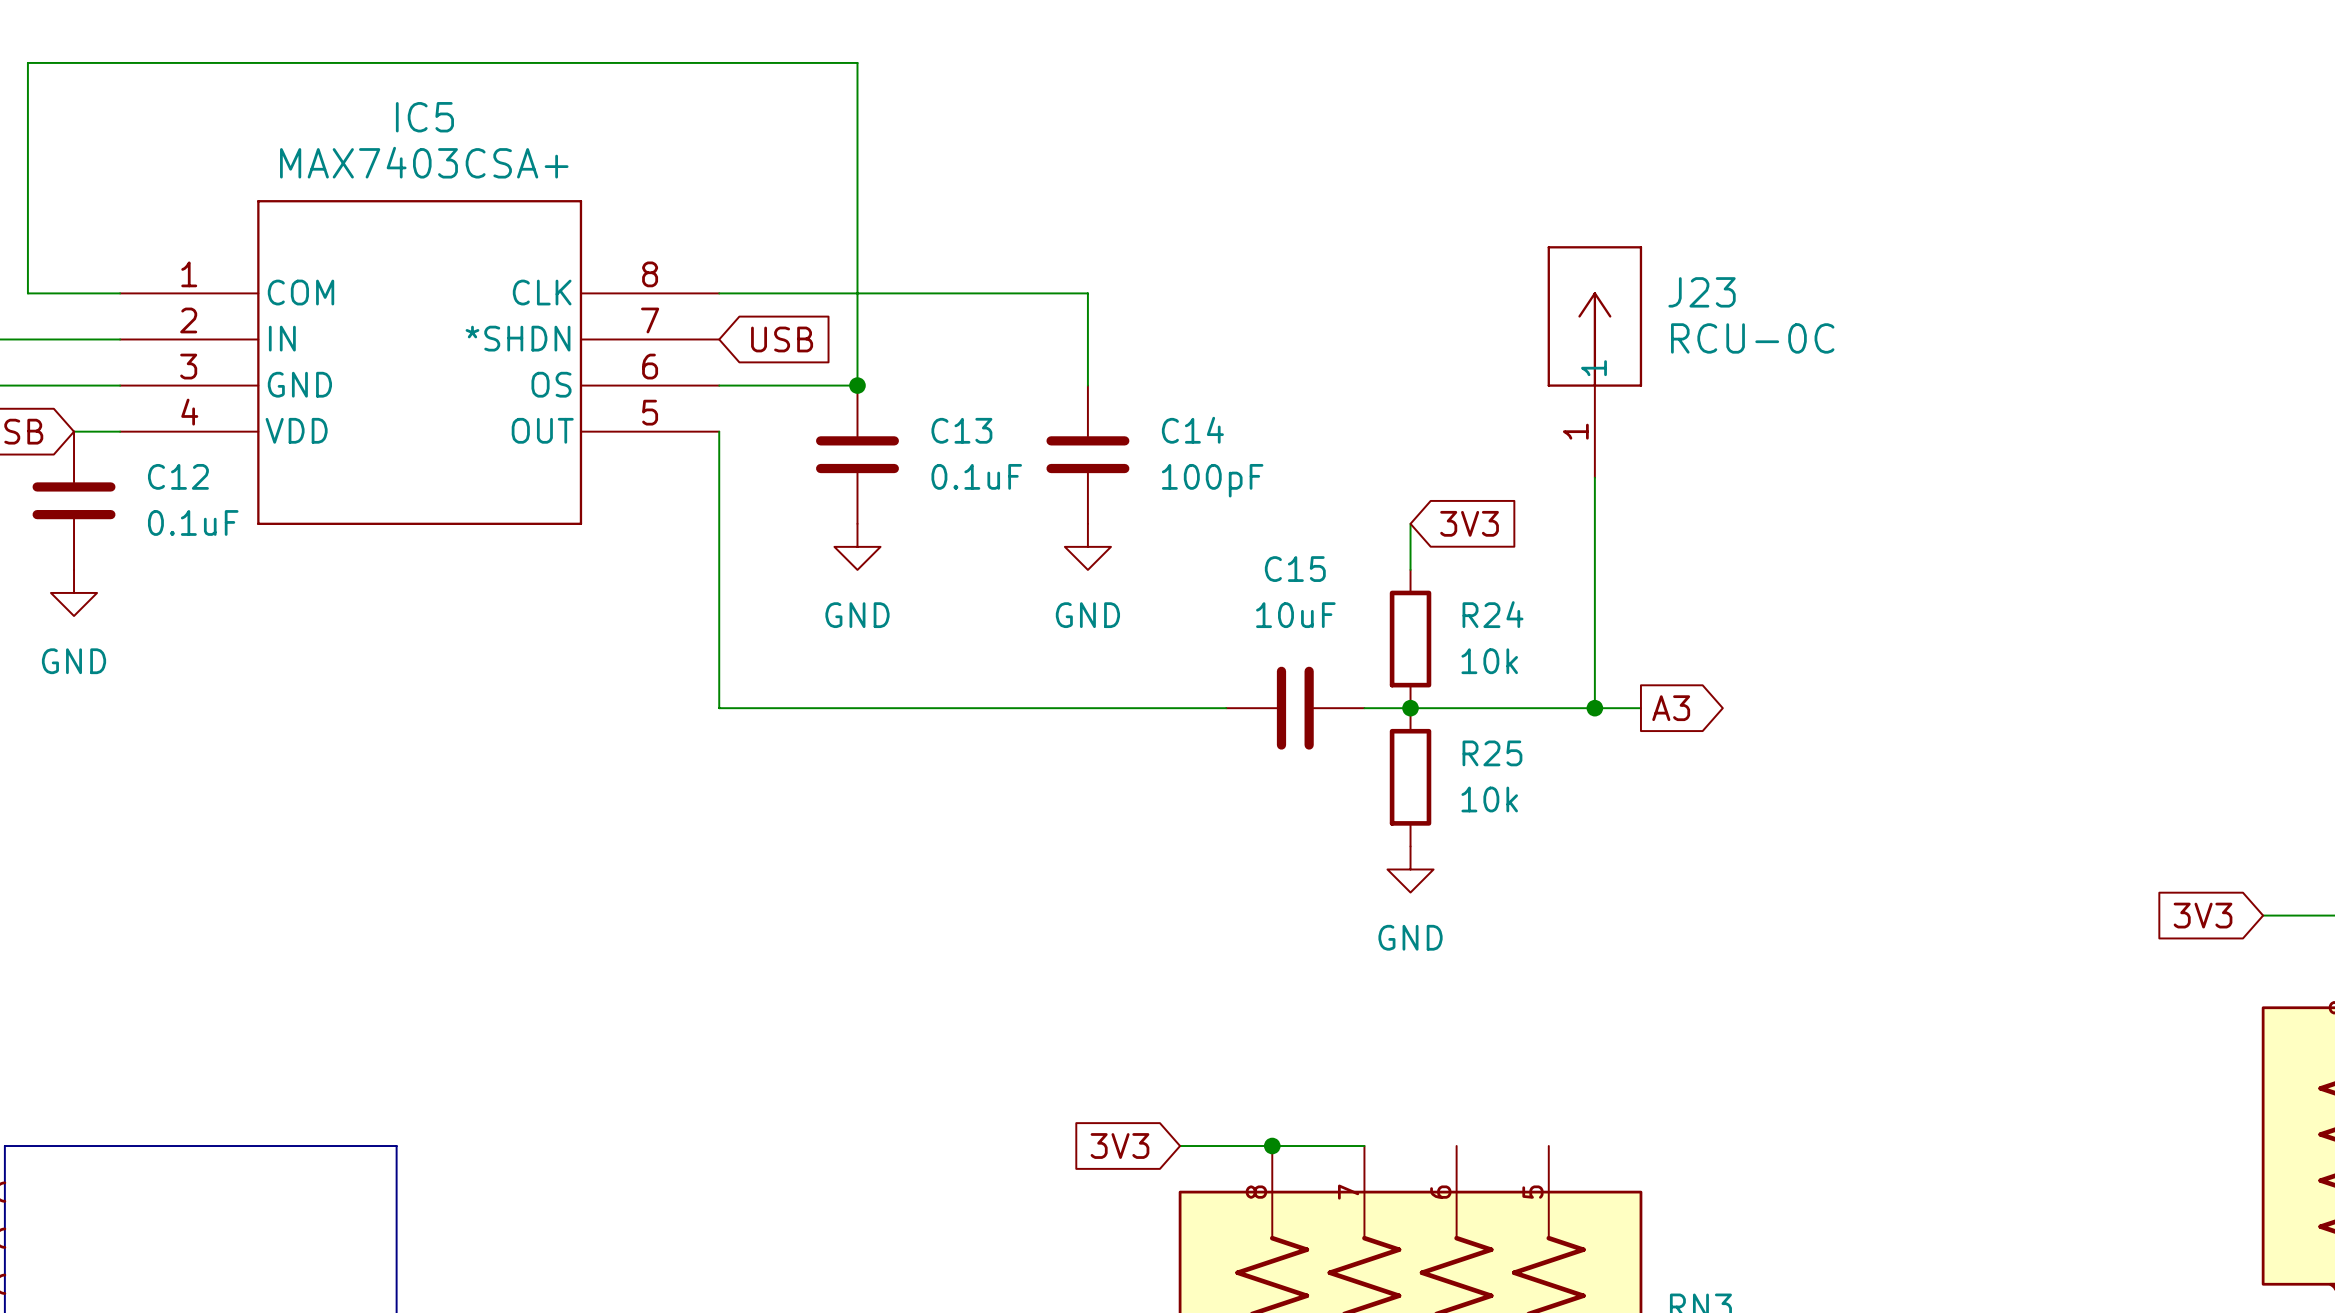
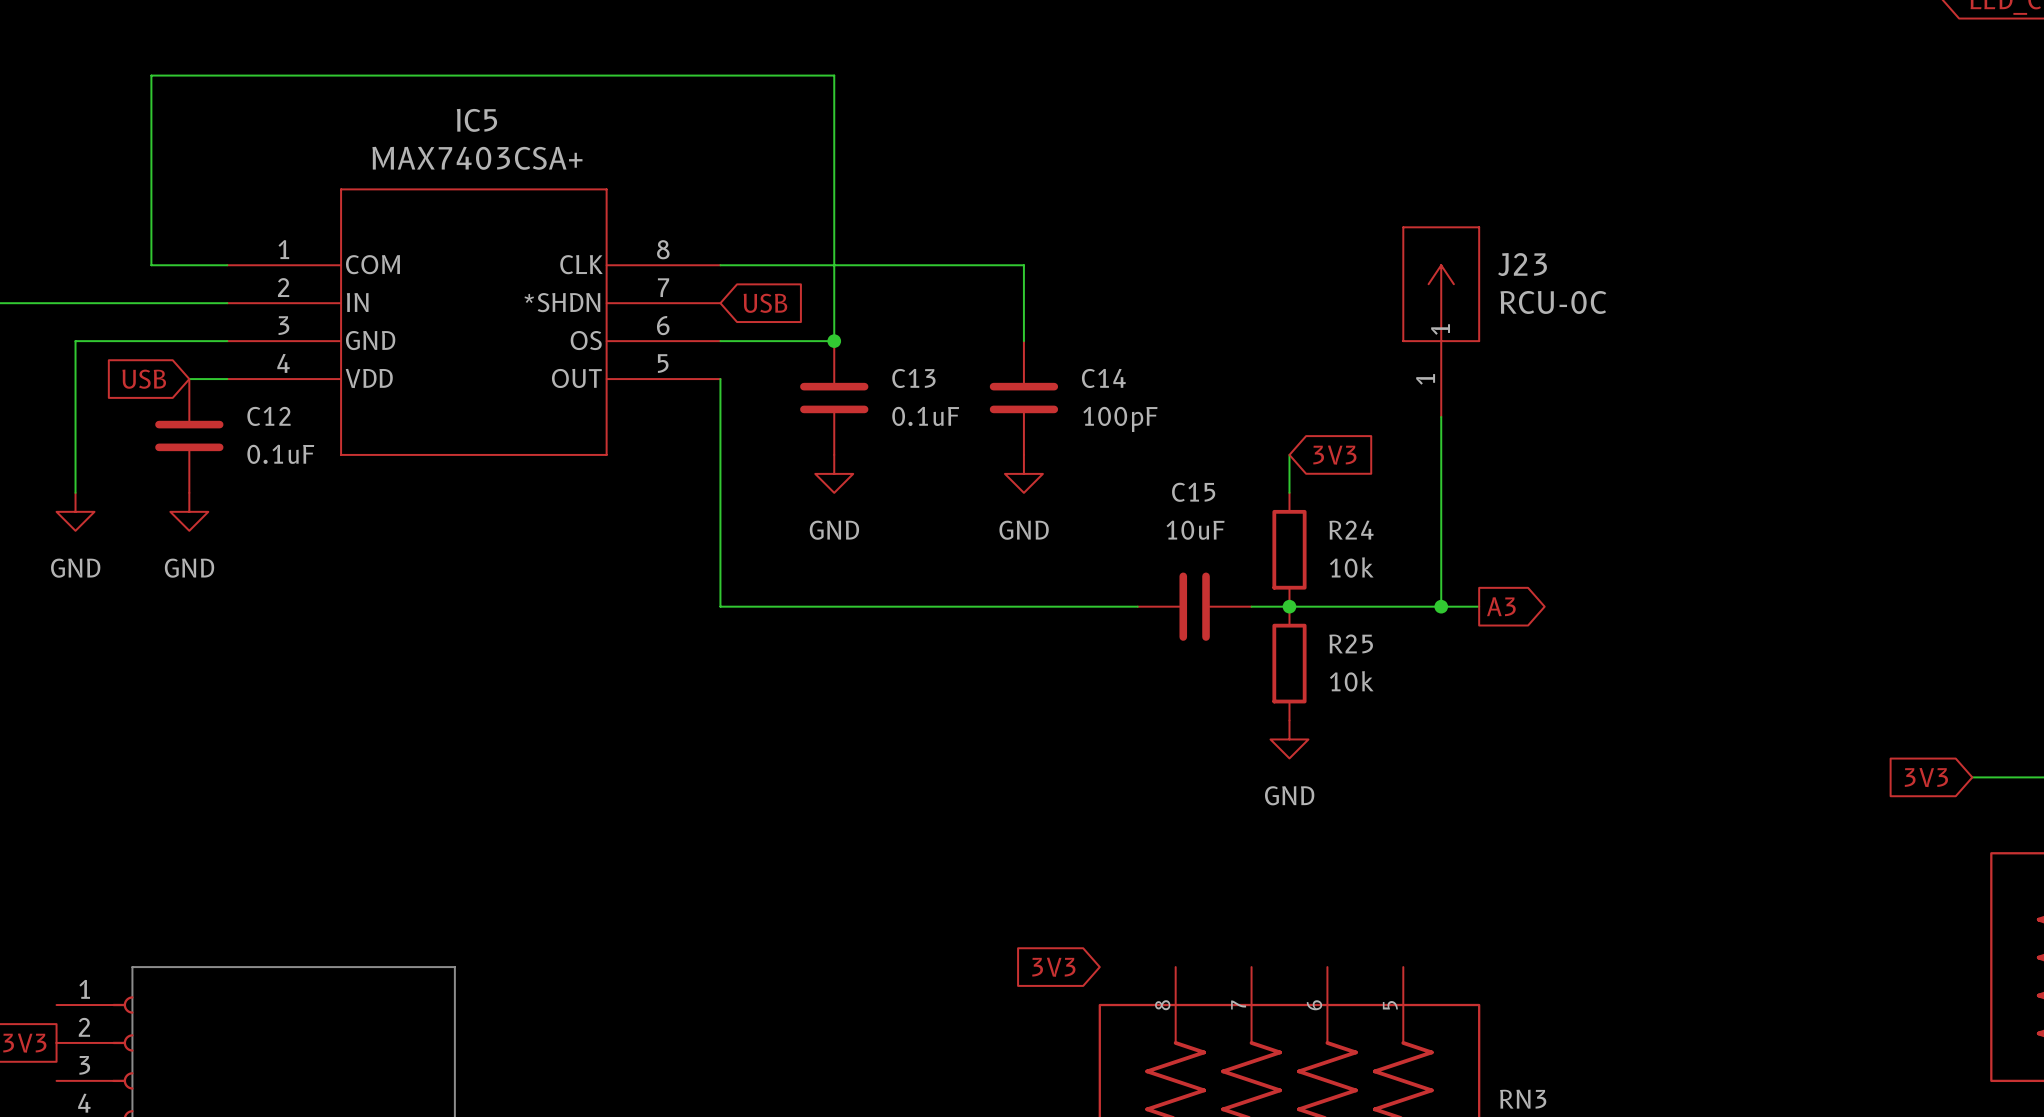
global label position: 3V3 (2203, 915) -> 3V3 (1926, 777)
wire: none -> (1972, 777) (1991, 777)
wire: (1180, 1146) (1364, 1146) -> none
junction: (1272, 1146) -> none

